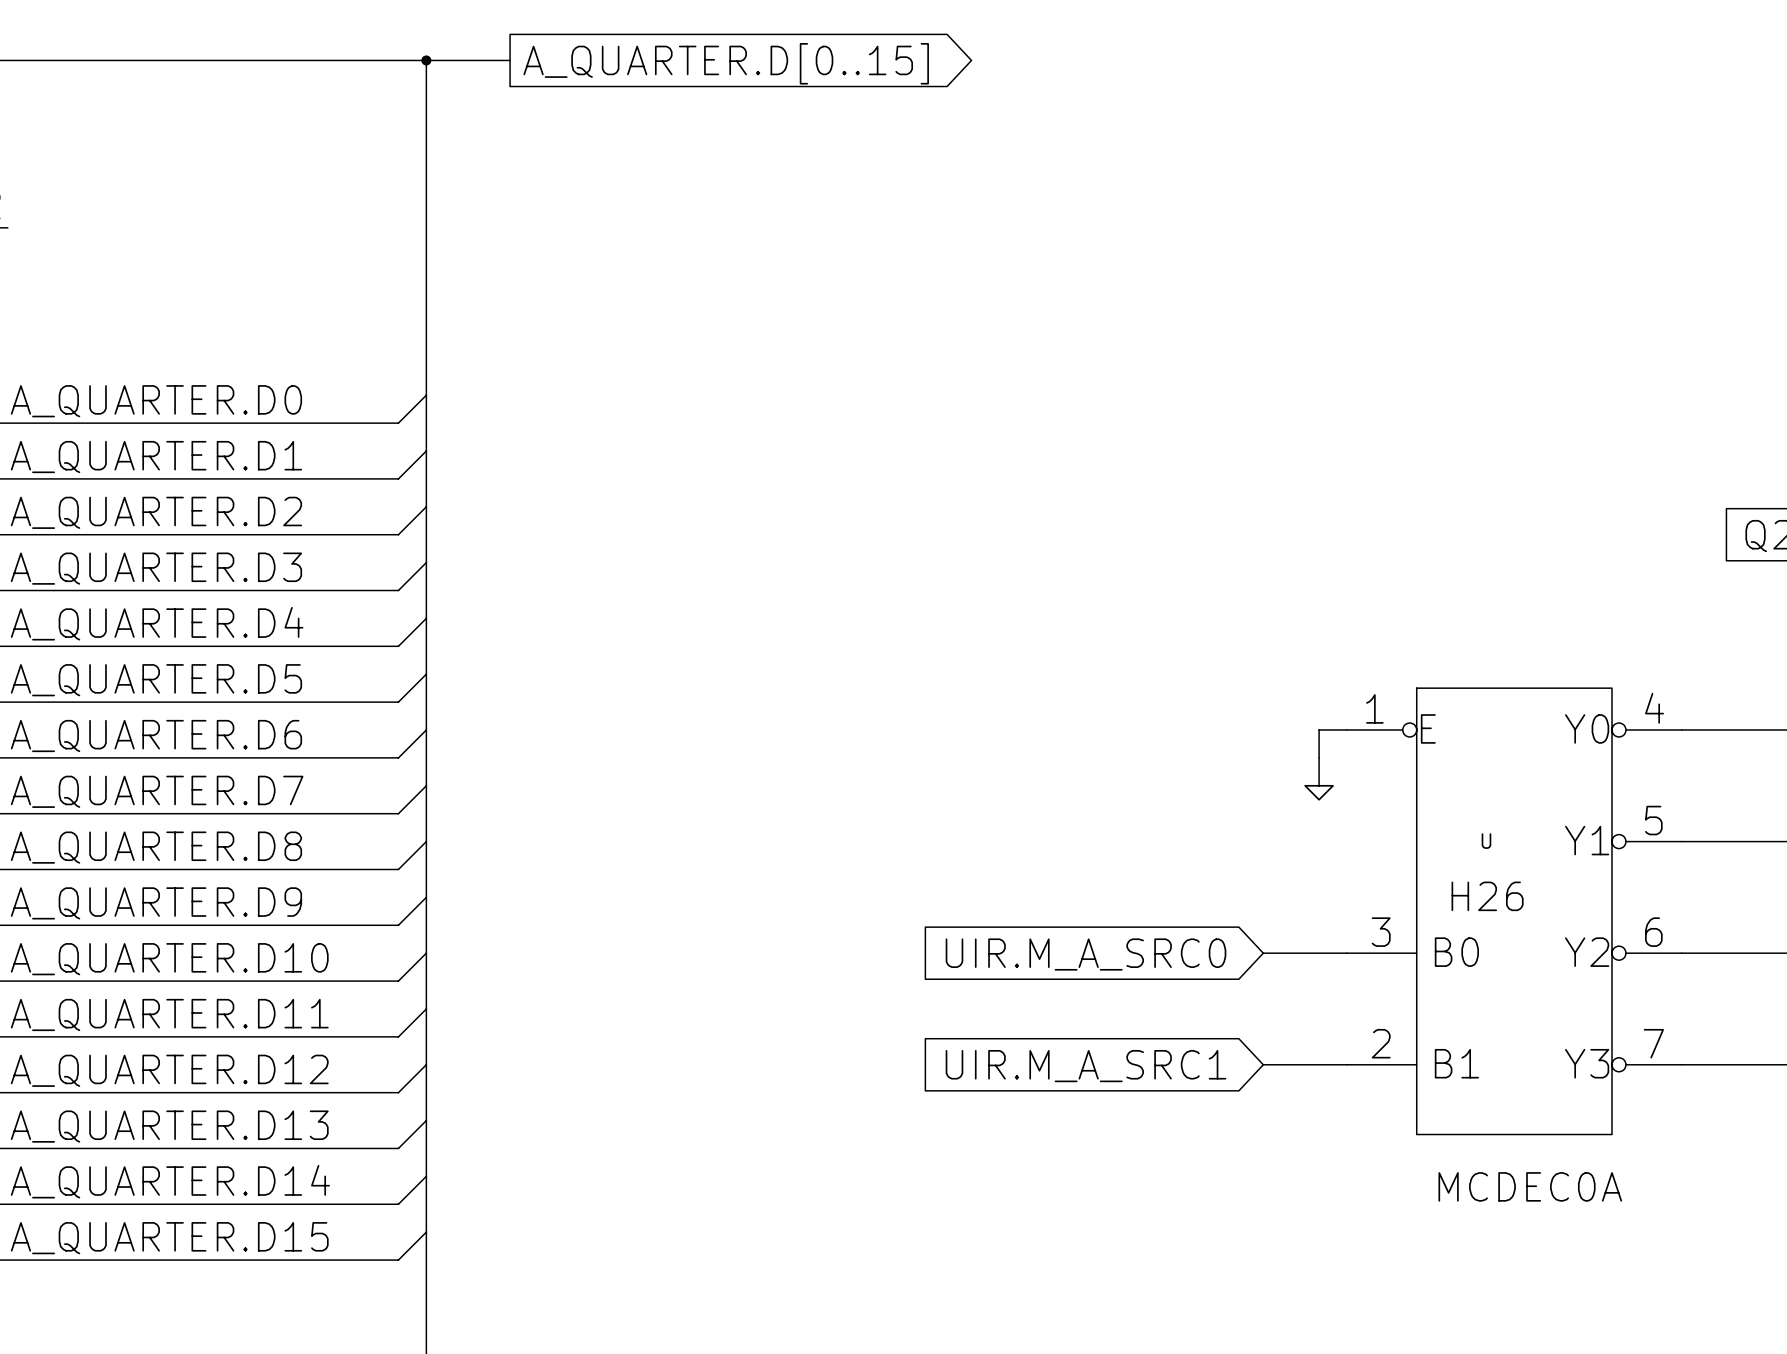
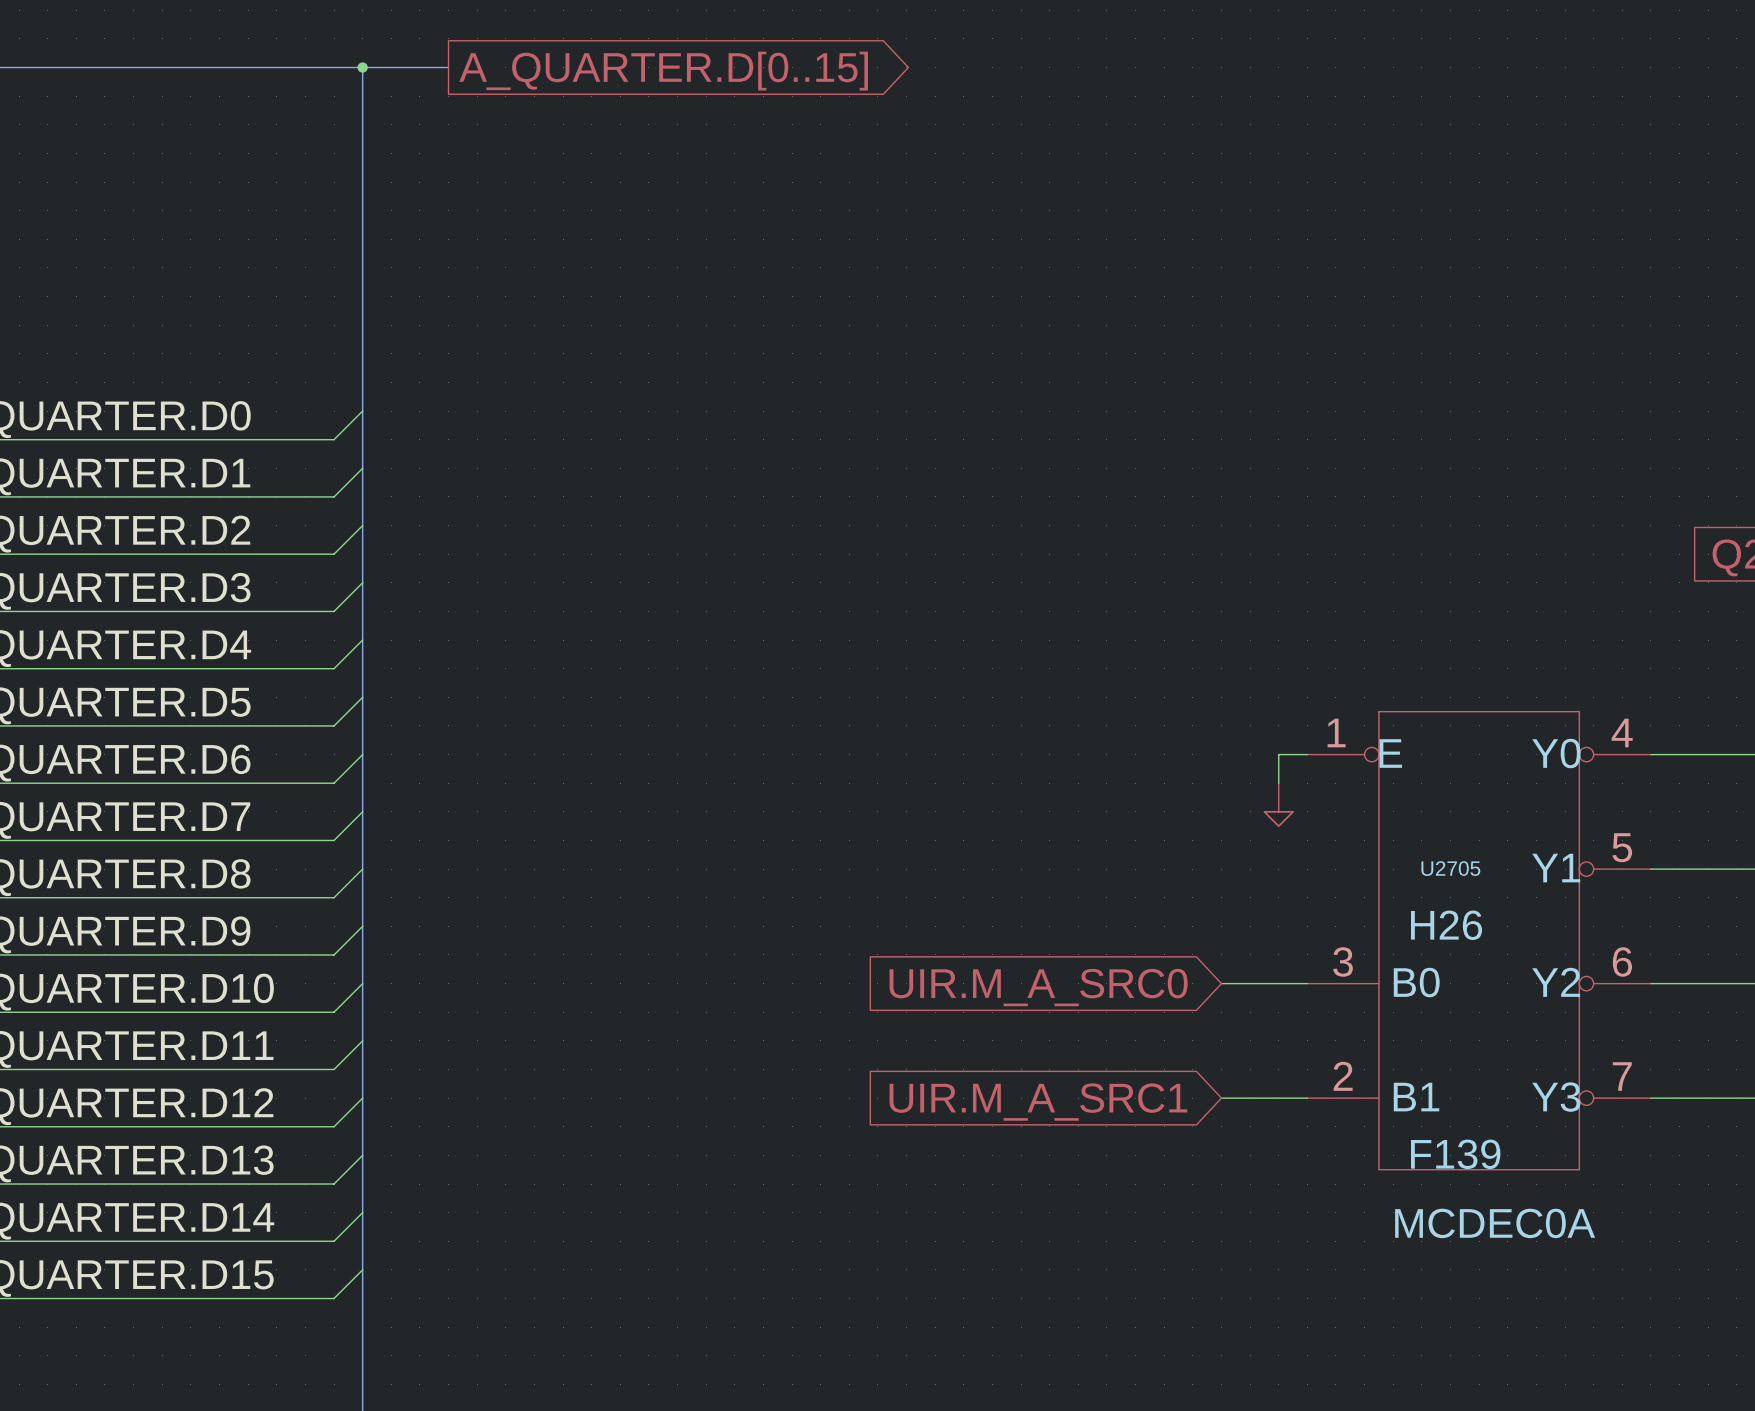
U name: U (1486, 841) -> U2705 (1450, 868)
U value: none -> F139 (1455, 1154)

